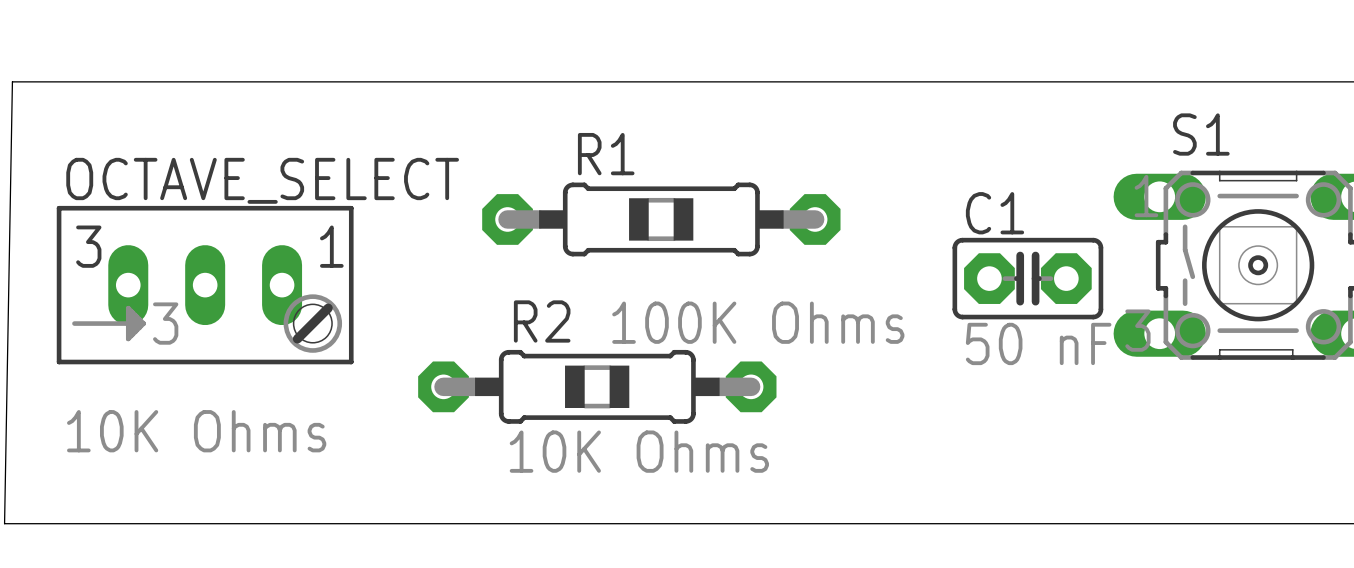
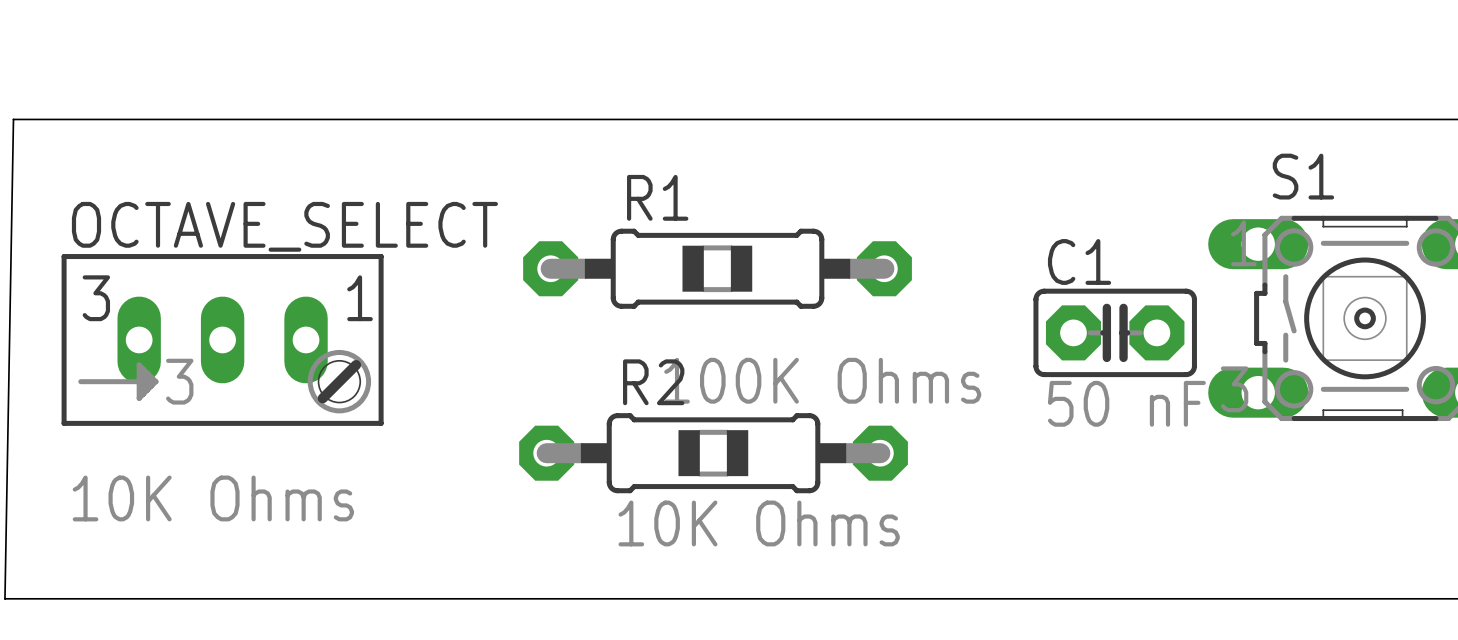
R2 position: (597, 386) -> (713, 453)

